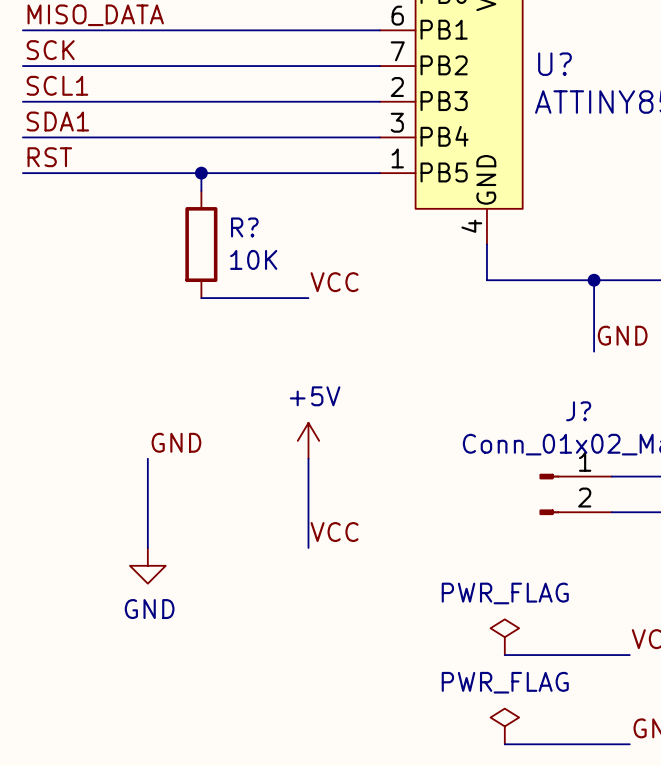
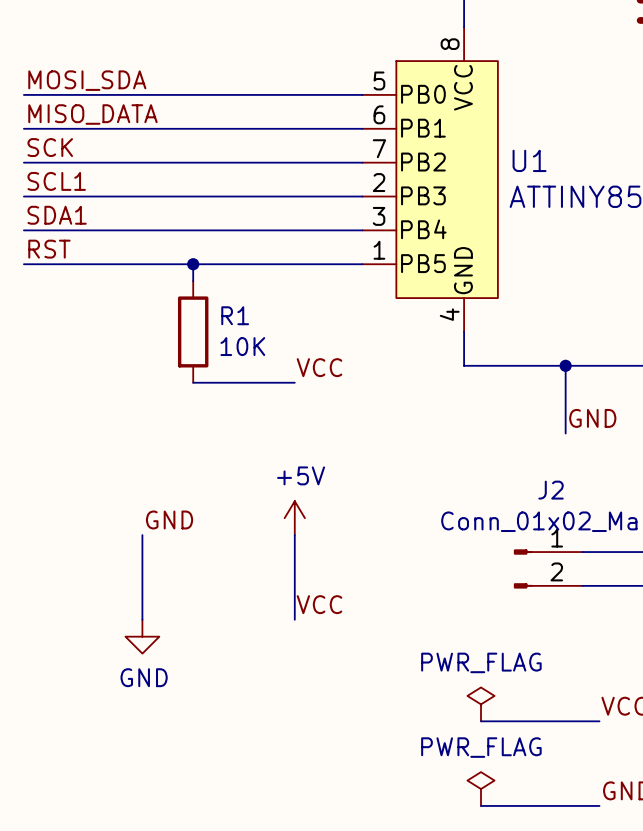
U? name: U? (554, 64) -> U1 (529, 160)
R? name: R? (244, 227) -> R1 (235, 315)
J? name: J? (578, 411) -> J2 (551, 490)

